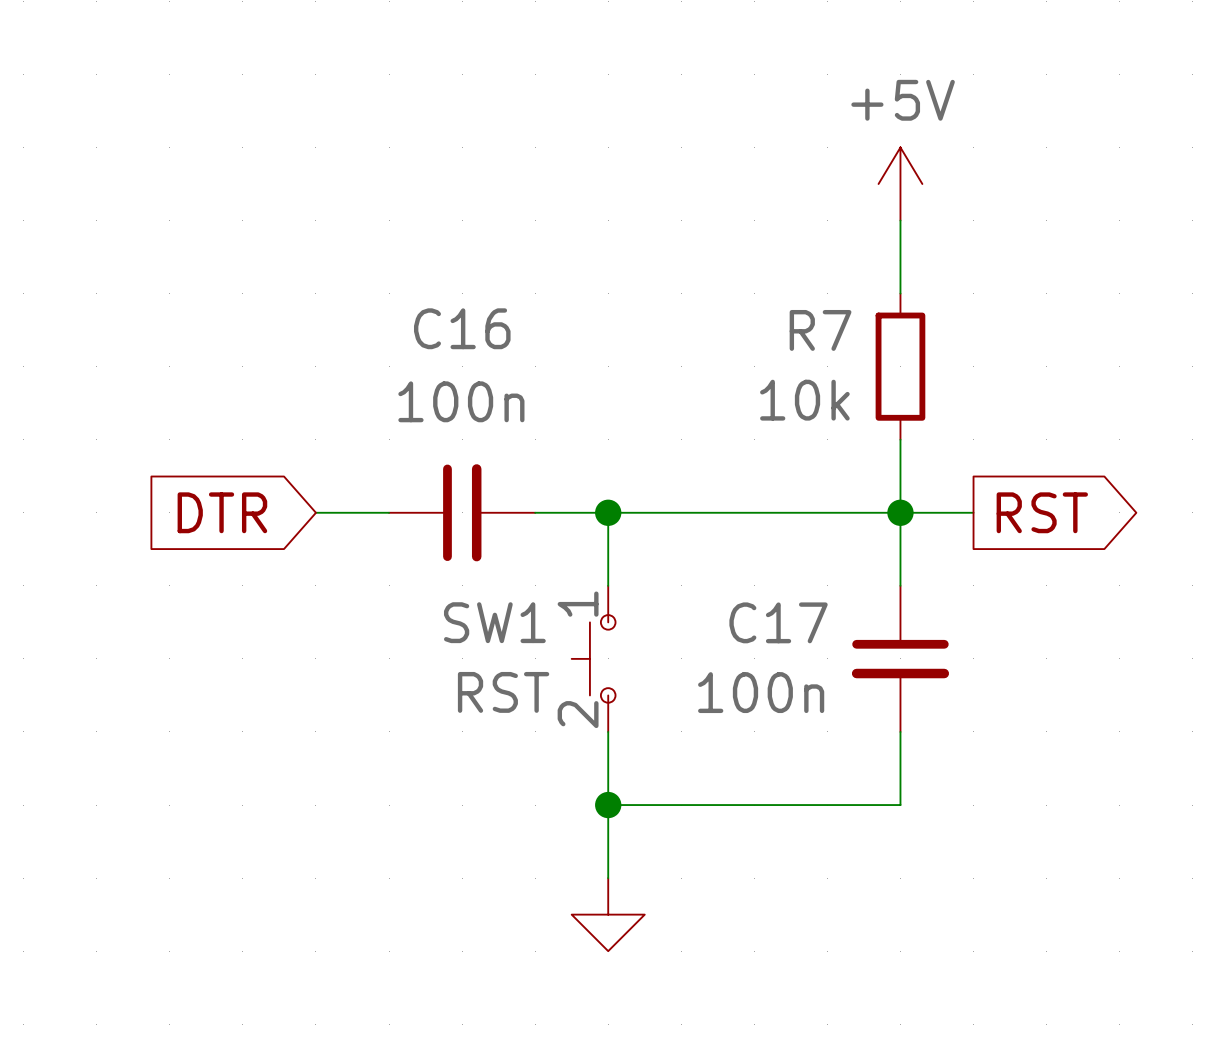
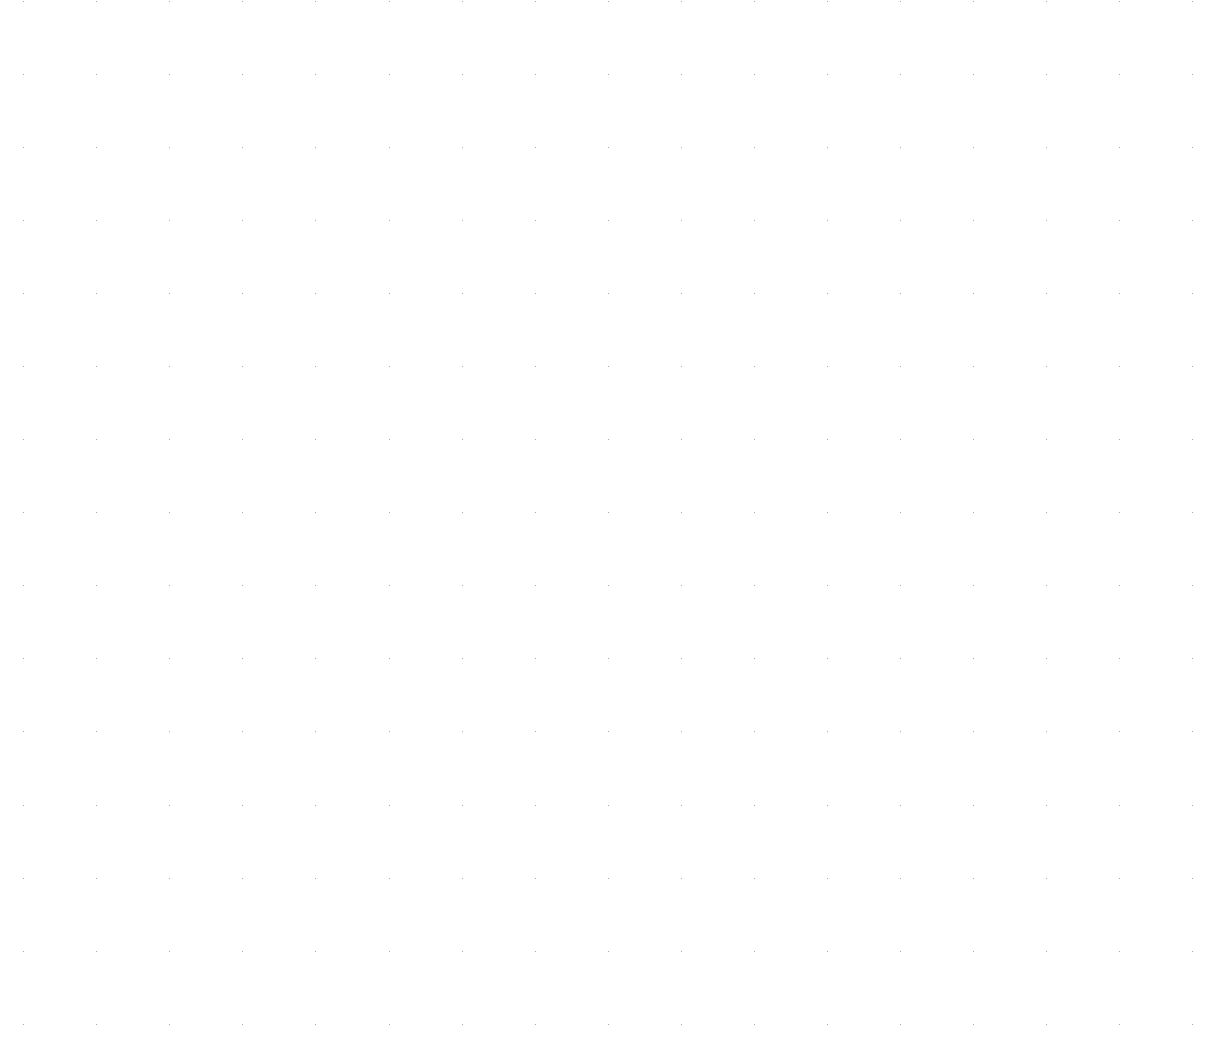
power symbol: +5V (900, 184) -> none
wire: (900, 220) (900, 293) -> none
R7: 10k (900, 366) -> none
wire: (900, 439) (900, 585) -> none
global label: DTR (222, 512) -> none
wire: (315, 512) (389, 512) -> none
C16: 100n (462, 512) -> none
wire: (535, 512) (973, 512) -> none
wire: (608, 512) (608, 585) -> none
junction: (608, 512) -> none
junction: (900, 512) -> none
global label: RST (1042, 512) -> none
SW1: RST (593, 658) -> none
C17: 100n (900, 658) -> none
wire: (608, 731) (608, 878) -> none
wire: (900, 731) (900, 805) (608, 805) -> none
junction: (608, 805) -> none
power symbol: (608, 914) -> none

